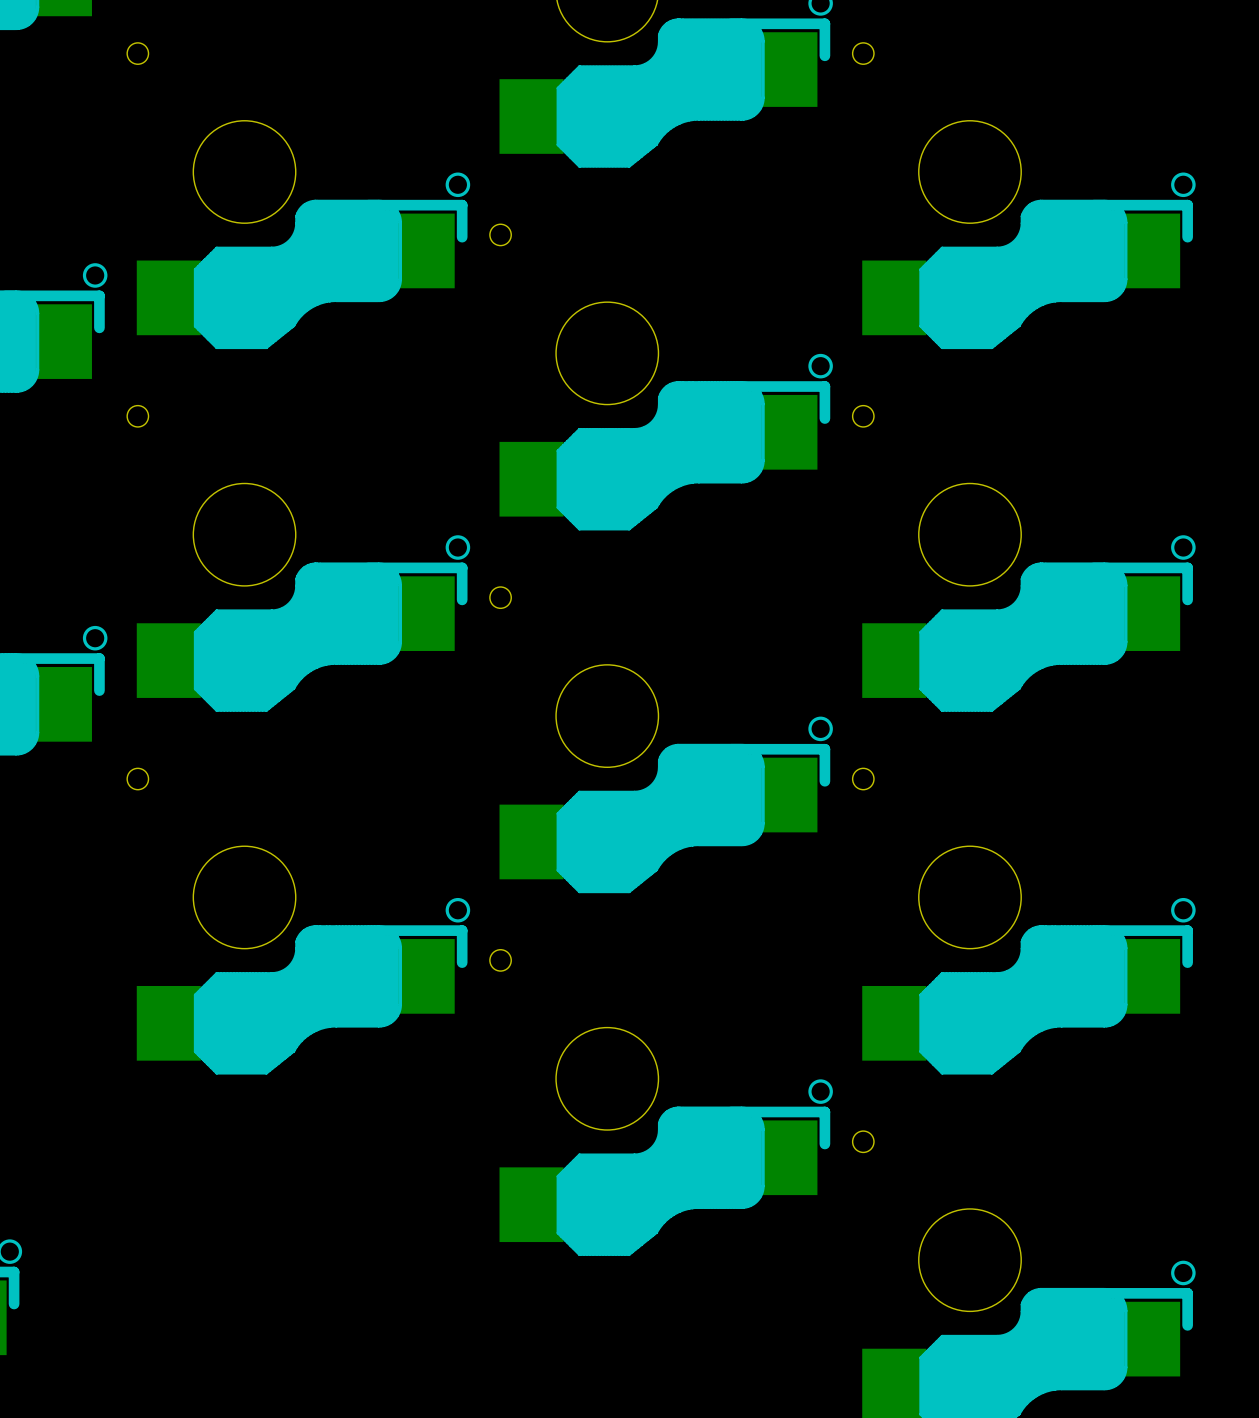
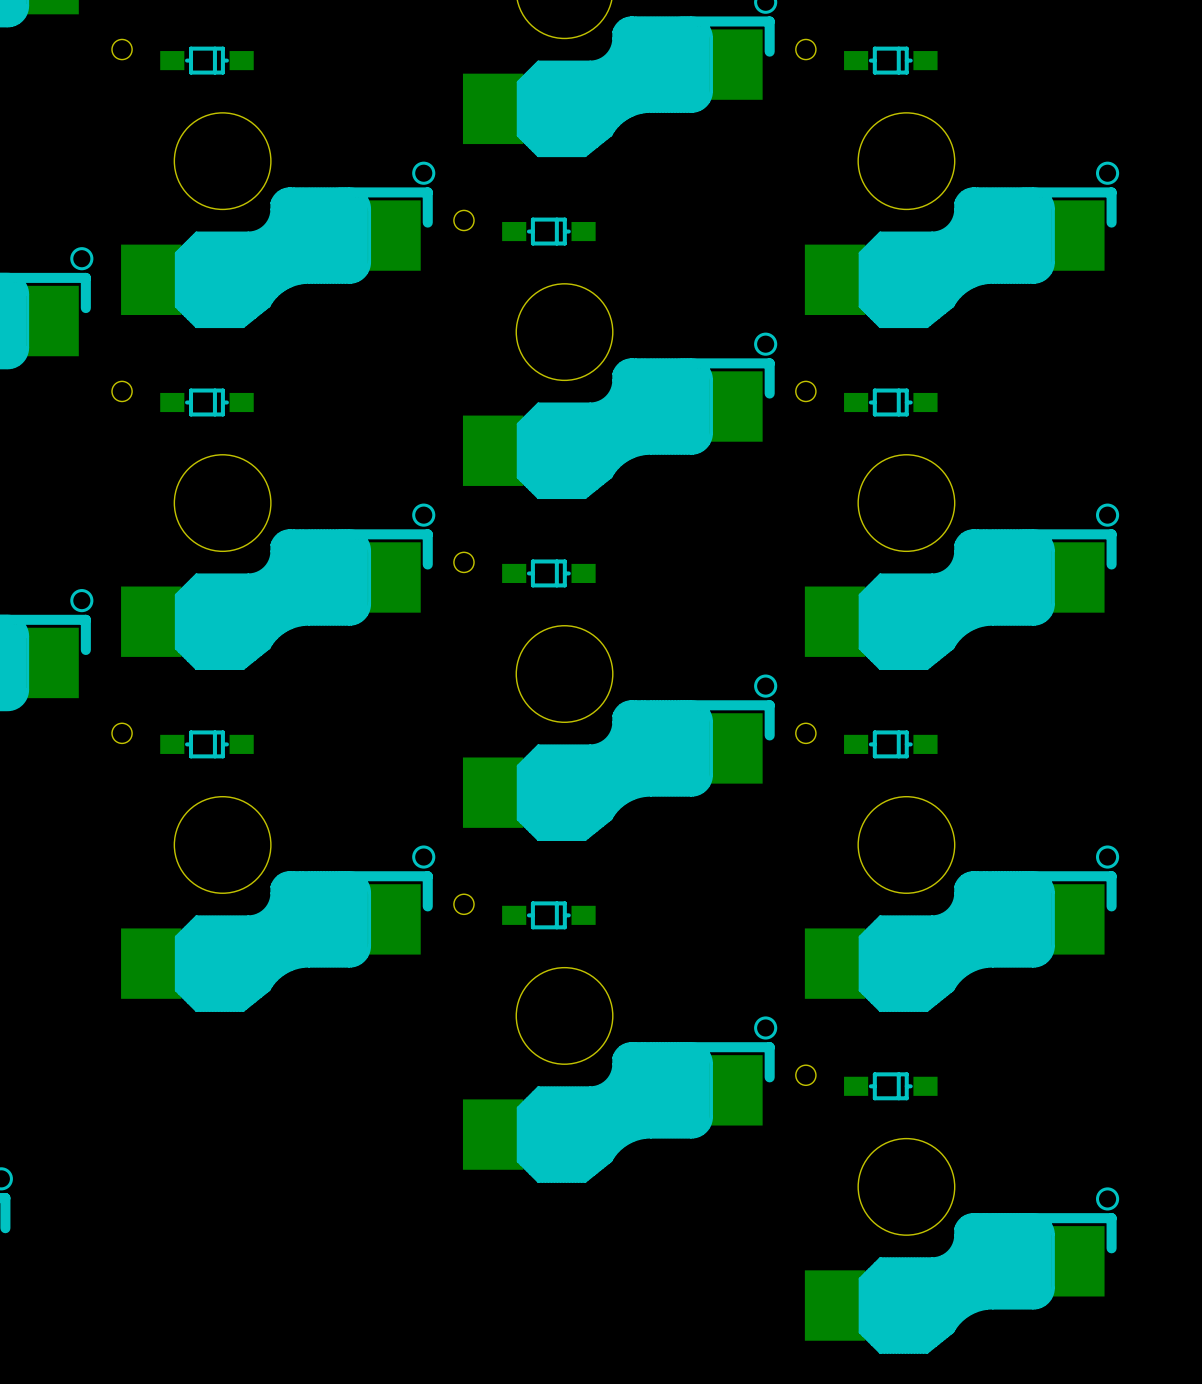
part: none -> (206, 60)
part: none -> (890, 60)
part: none -> (548, 231)
part: none -> (206, 402)
part: none -> (890, 402)
part: none -> (548, 573)
part: none -> (206, 744)
part: none -> (890, 744)
part: none -> (548, 915)
part: none -> (890, 1086)

